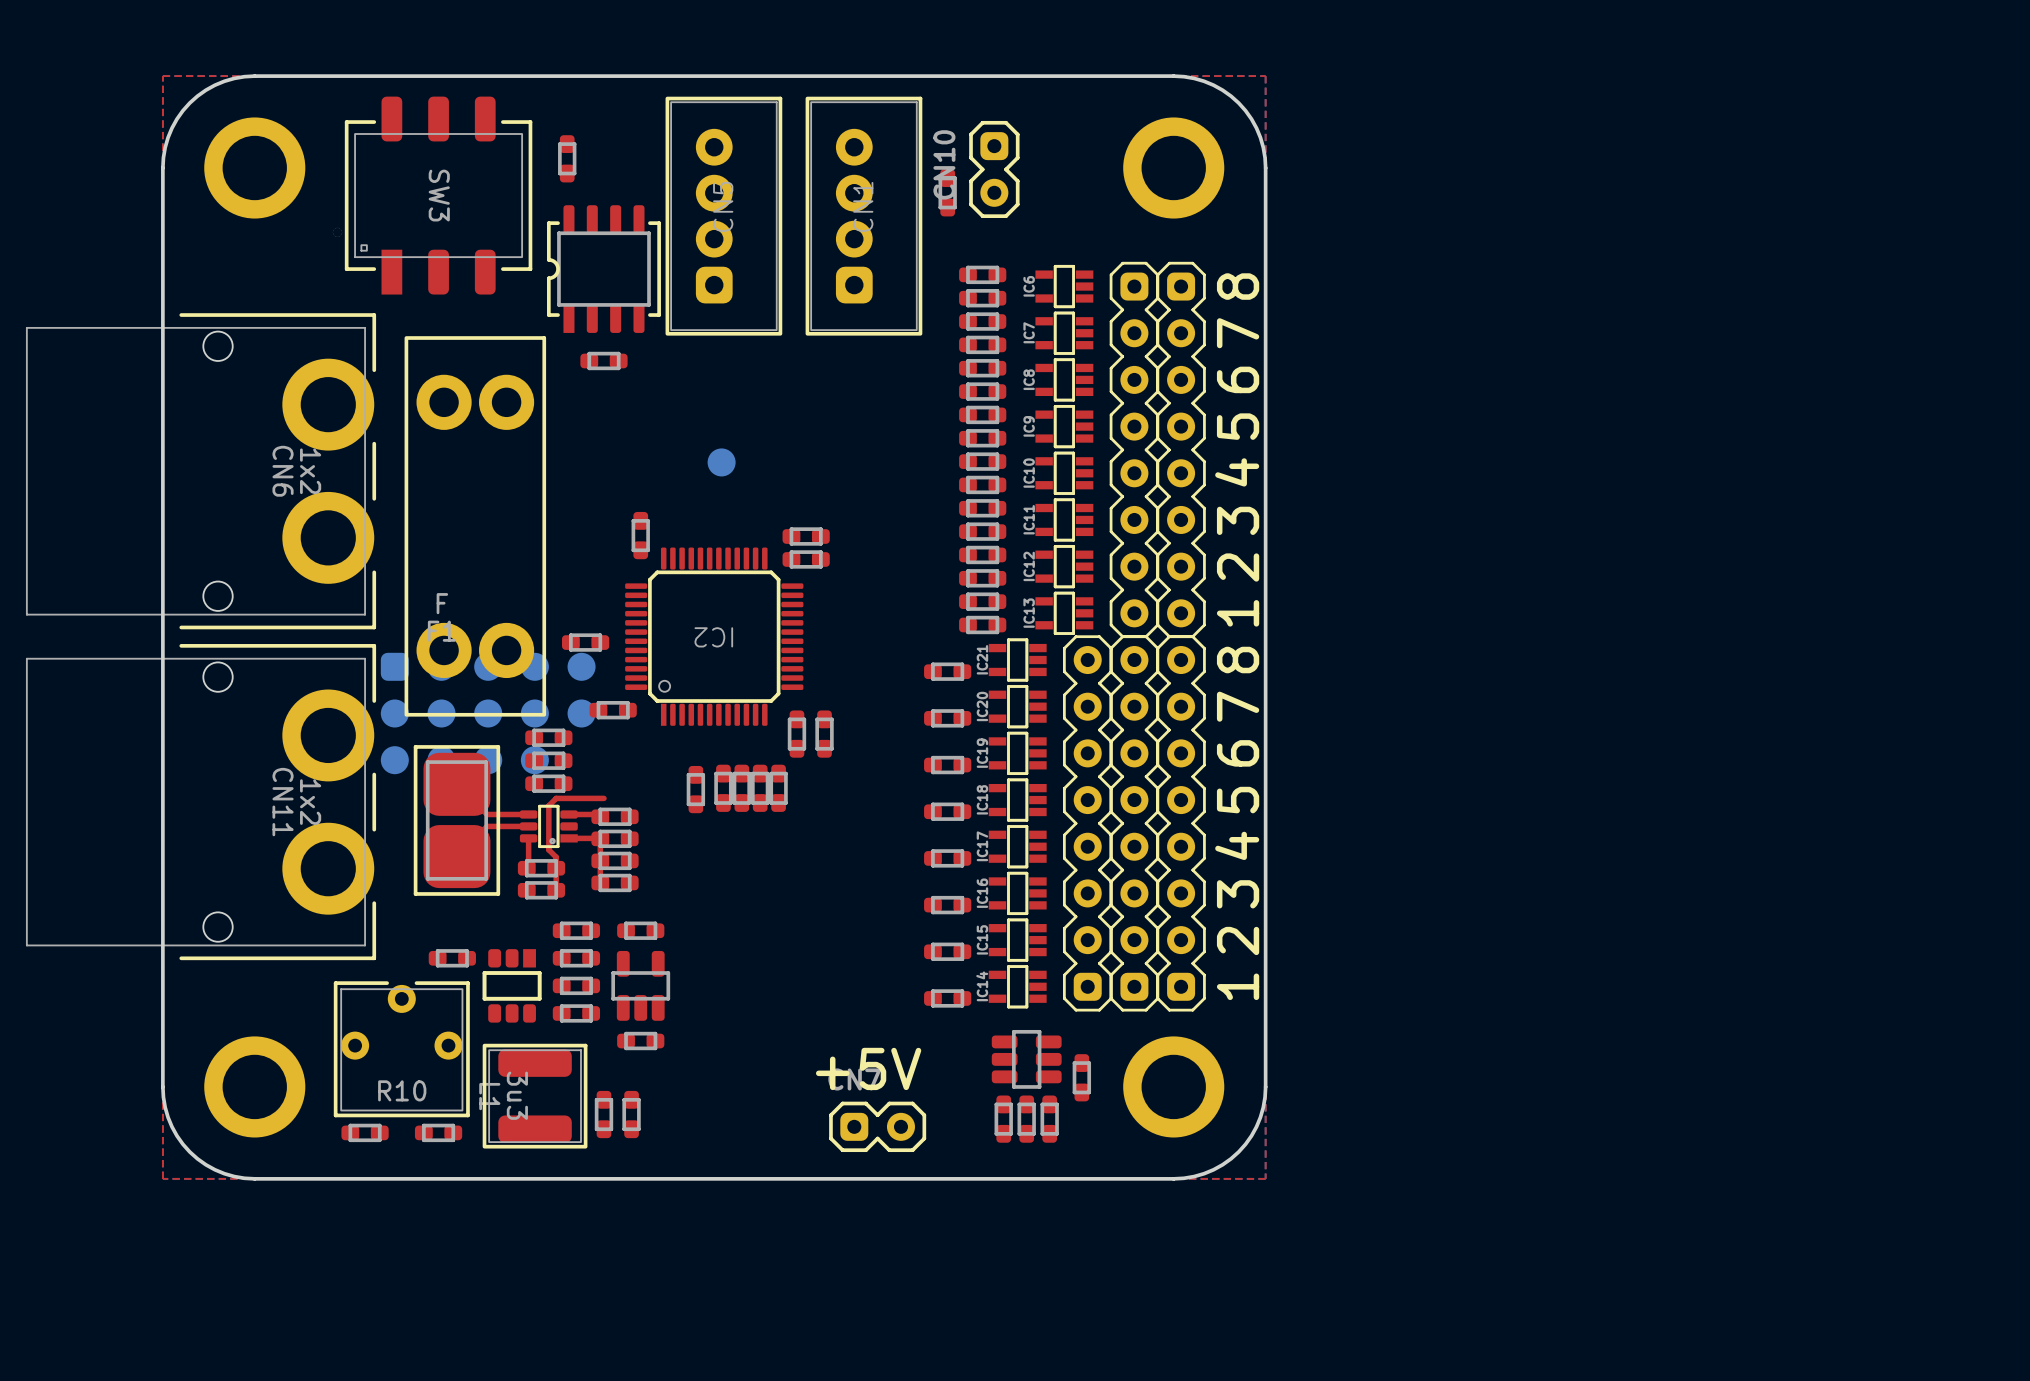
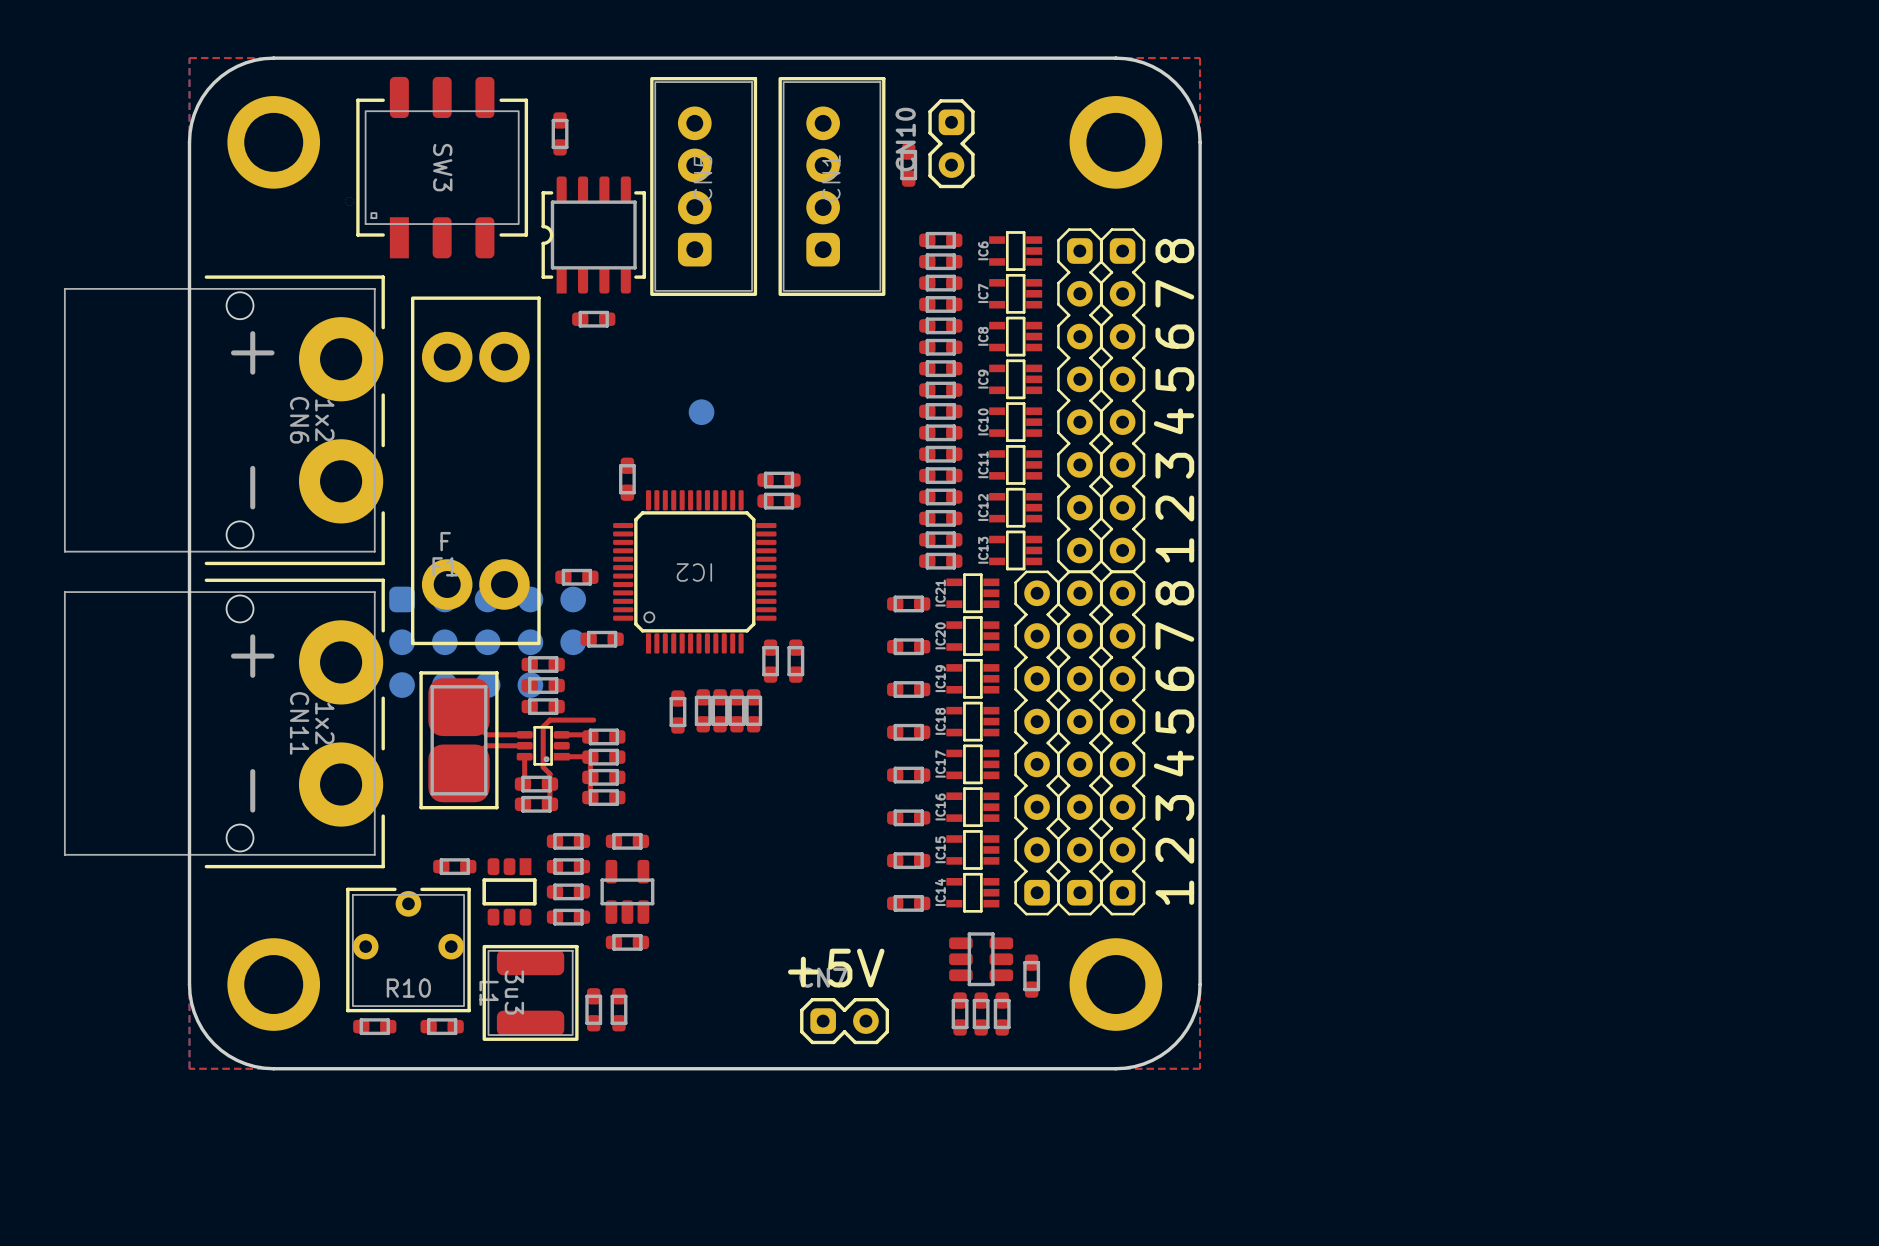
CN6 footprint: [25, 313, 377, 630] -> [64, 275, 385, 566]
CN11 footprint: [25, 644, 377, 961] -> [64, 578, 385, 869]

